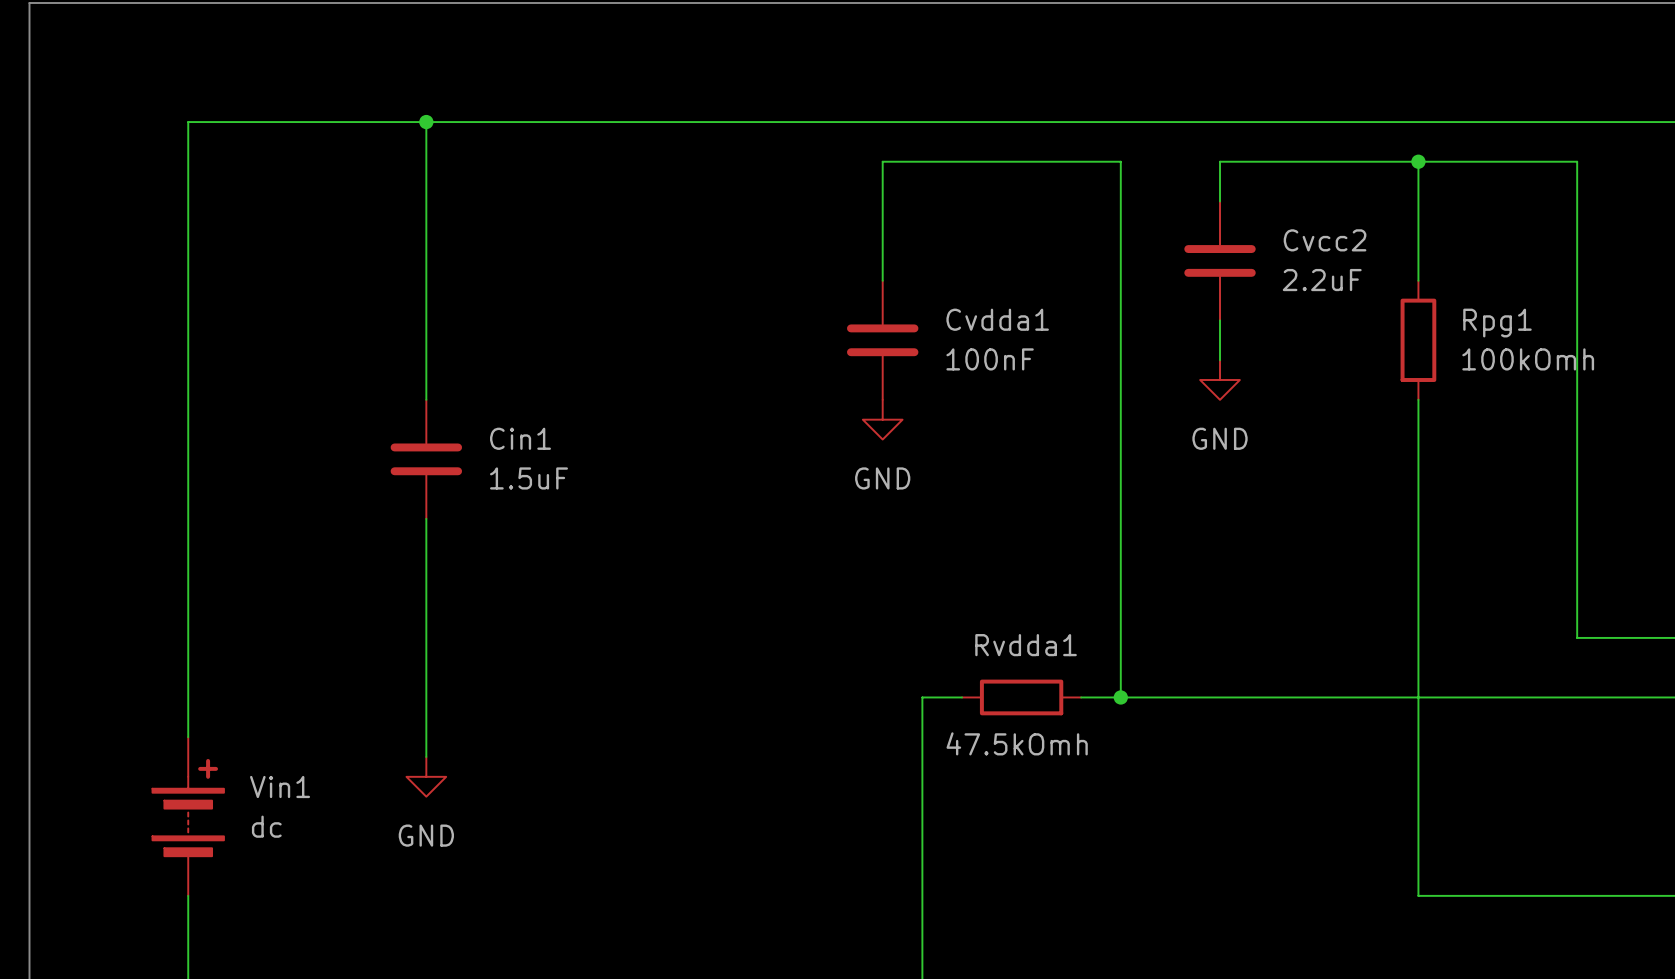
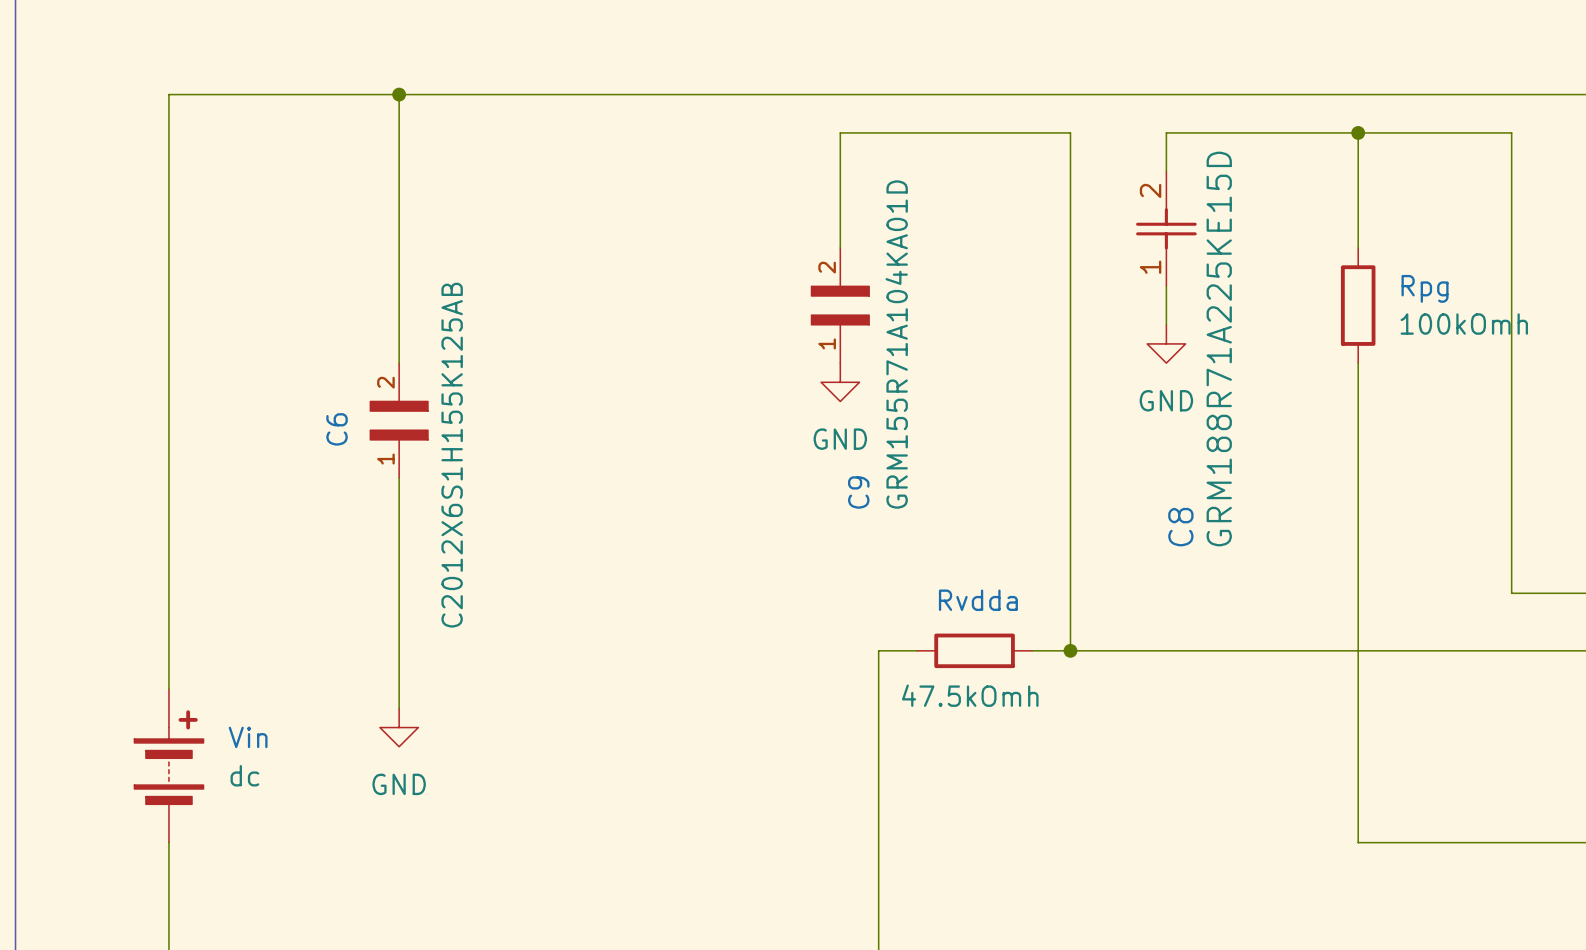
Cvcc2: 2.2uF (1220, 260) -> none
C8: none -> GRM188R71A225KE15D (1166, 228)
Rpg1 name: Rpg1 (1497, 323) -> Rpg (1425, 288)
Cvdda1: 100nF (882, 340) -> none
C9: none -> GRM155R71A104KA01D (840, 305)
Cin1: 1.5uF (426, 459) -> none
C6: none -> C2012X6S1H155K125AB (399, 420)
Rvdda1 name: Rvdda1 (1026, 645) -> Rvdda (978, 600)
Vin1 name: Vin1 (280, 787) -> Vin (248, 737)

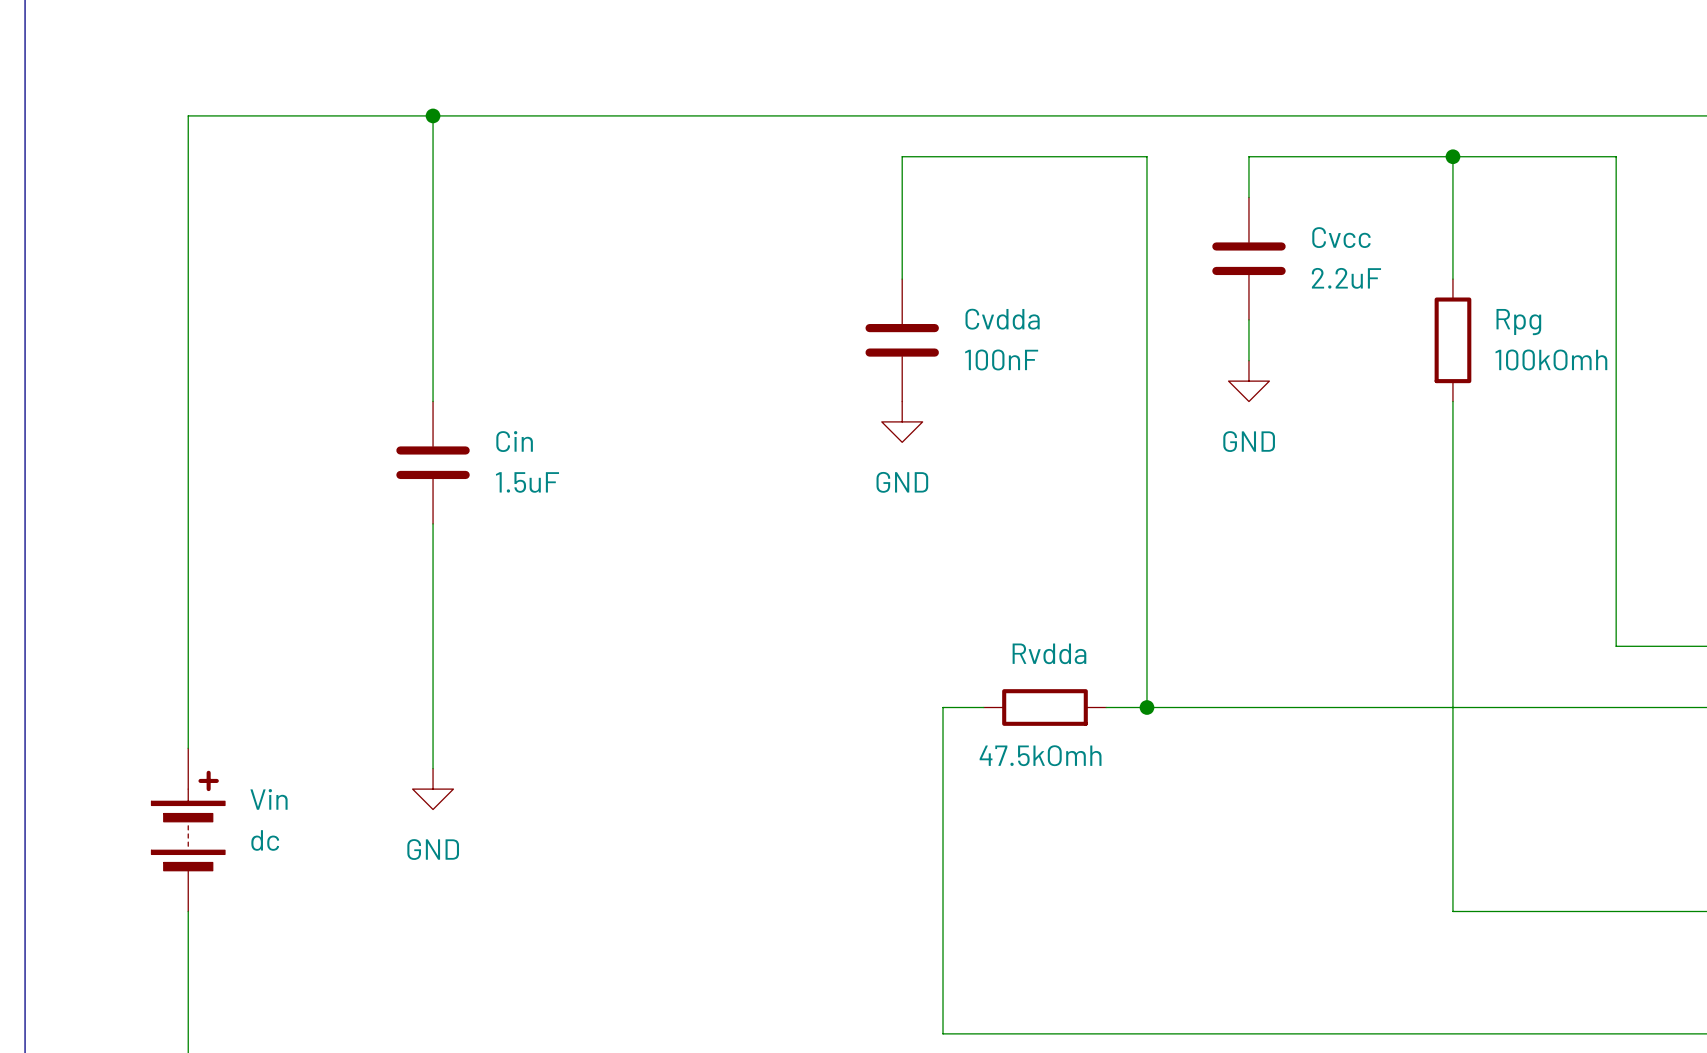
C8: GRM188R71A225KE15D (1166, 228) -> none
Cvcc: none -> 2.2uF (1248, 258)
C9: GRM155R71A104KA01D (840, 305) -> none
Cvdda: none -> 100nF (902, 340)
C6: C2012X6S1H155K125AB (399, 420) -> none
Cin: none -> 1.5uF (433, 462)

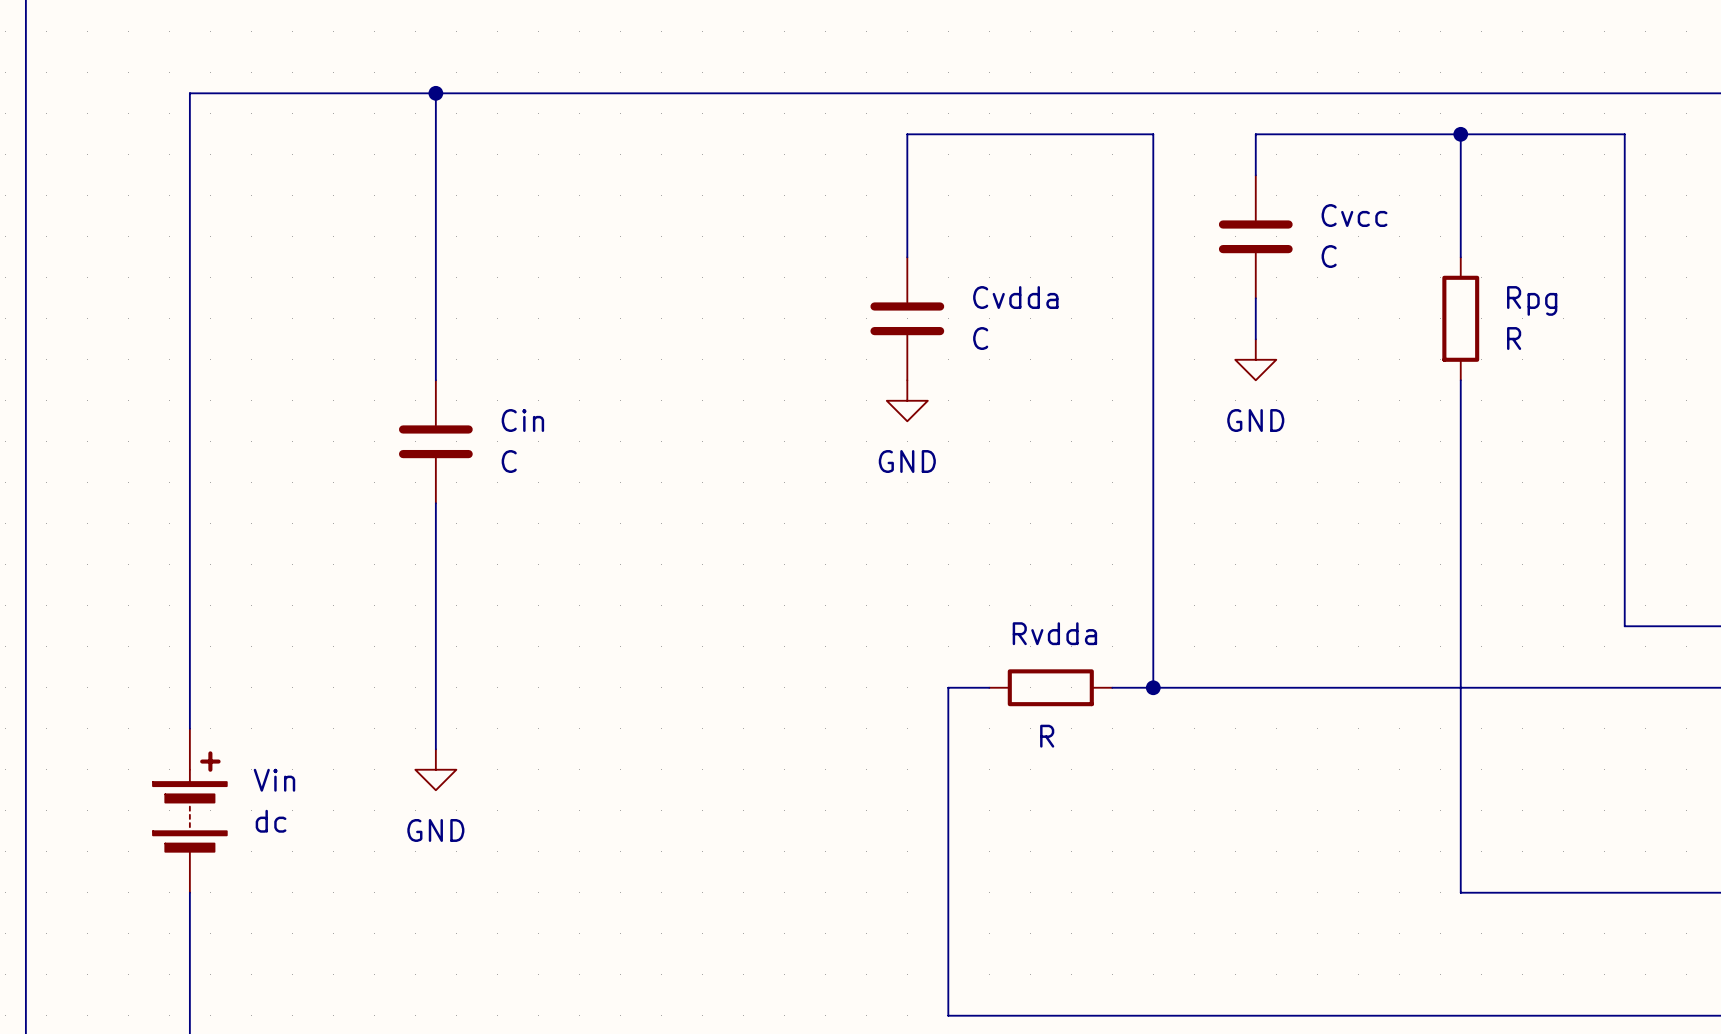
Cvcc value: 2.2uF (1346, 278) -> C (1329, 256)
Cvdda value: 100nF (1001, 359) -> C (980, 338)
Rpg value: 100kOmh (1551, 359) -> R (1514, 338)
Cin value: 1.5uF (527, 482) -> C (509, 461)
Rvdda value: 47.5kOmh (1040, 755) -> R (1047, 736)

